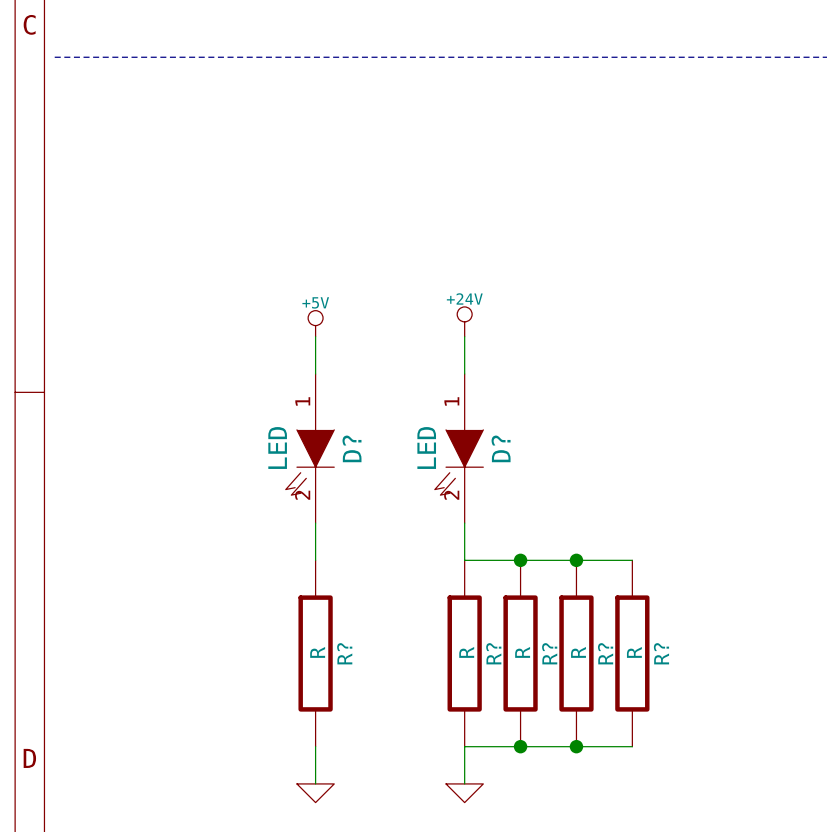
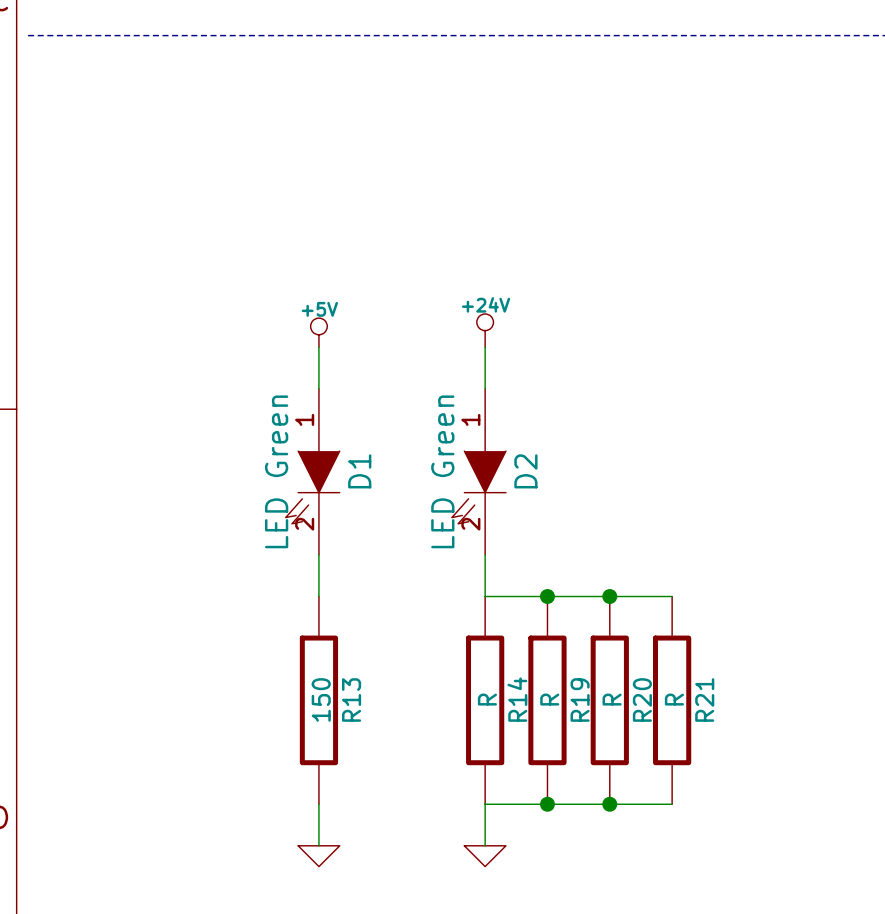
D? value: LED (277, 448) -> LED Green (276, 471)
D? name: D? (352, 448) -> D1 (359, 471)
D? value: LED (426, 448) -> LED Green (442, 471)
D? name: D? (501, 448) -> D2 (525, 471)
R? value: R (317, 652) -> 150 (321, 699)
R? name: R? (344, 653) -> R13 (351, 699)
R? name: R? (493, 653) -> R14 (517, 699)
R? name: R? (549, 653) -> R19 (580, 699)
R? name: R? (605, 653) -> R20 (642, 699)
R? name: R? (661, 653) -> R21 (704, 699)

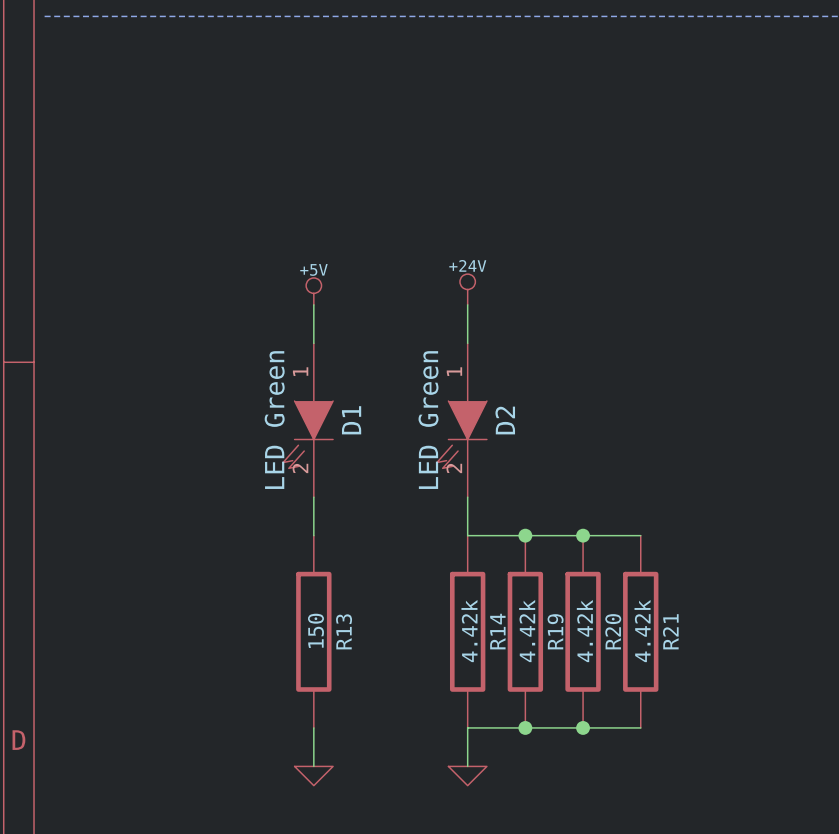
R14 value: R (487, 699) -> 4.42k (469, 631)
R19 value: R (549, 699) -> 4.42k (527, 631)
R20 value: R (612, 699) -> 4.42k (584, 631)
R21 value: R (674, 699) -> 4.42k (642, 631)

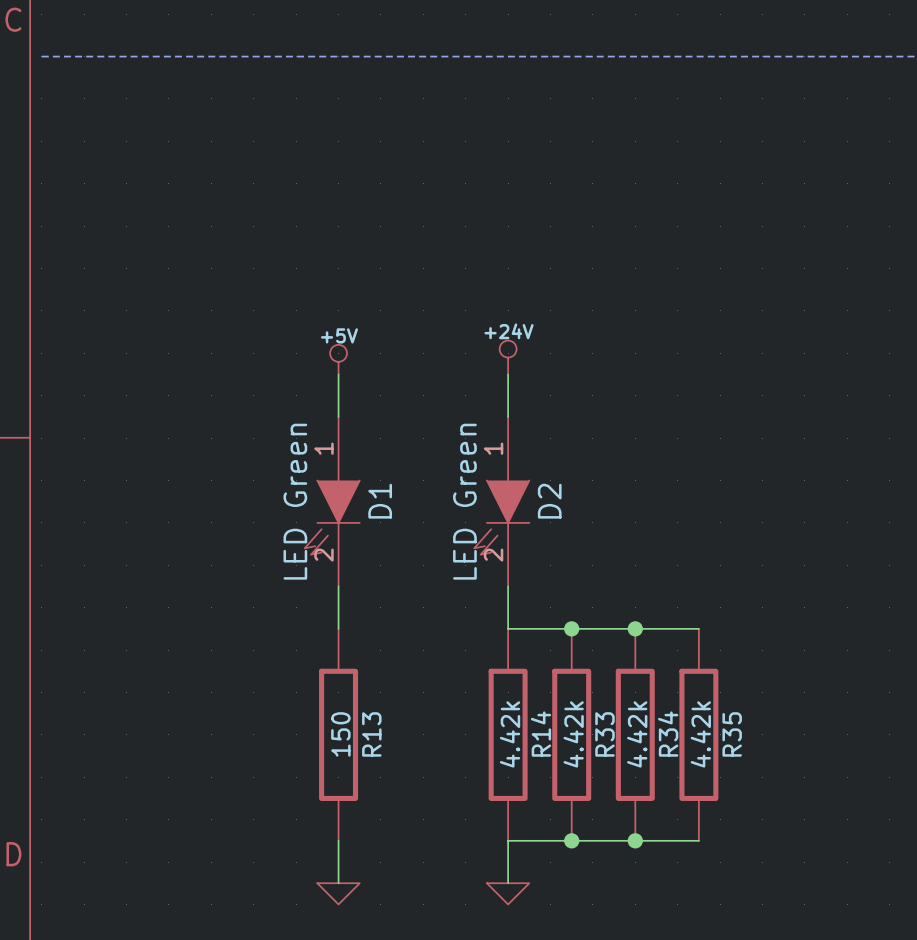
R19 name: R19 (555, 631) -> R33 (604, 734)
R20 name: R20 (613, 631) -> R34 (668, 734)
R21 name: R21 (670, 631) -> R35 (732, 734)

